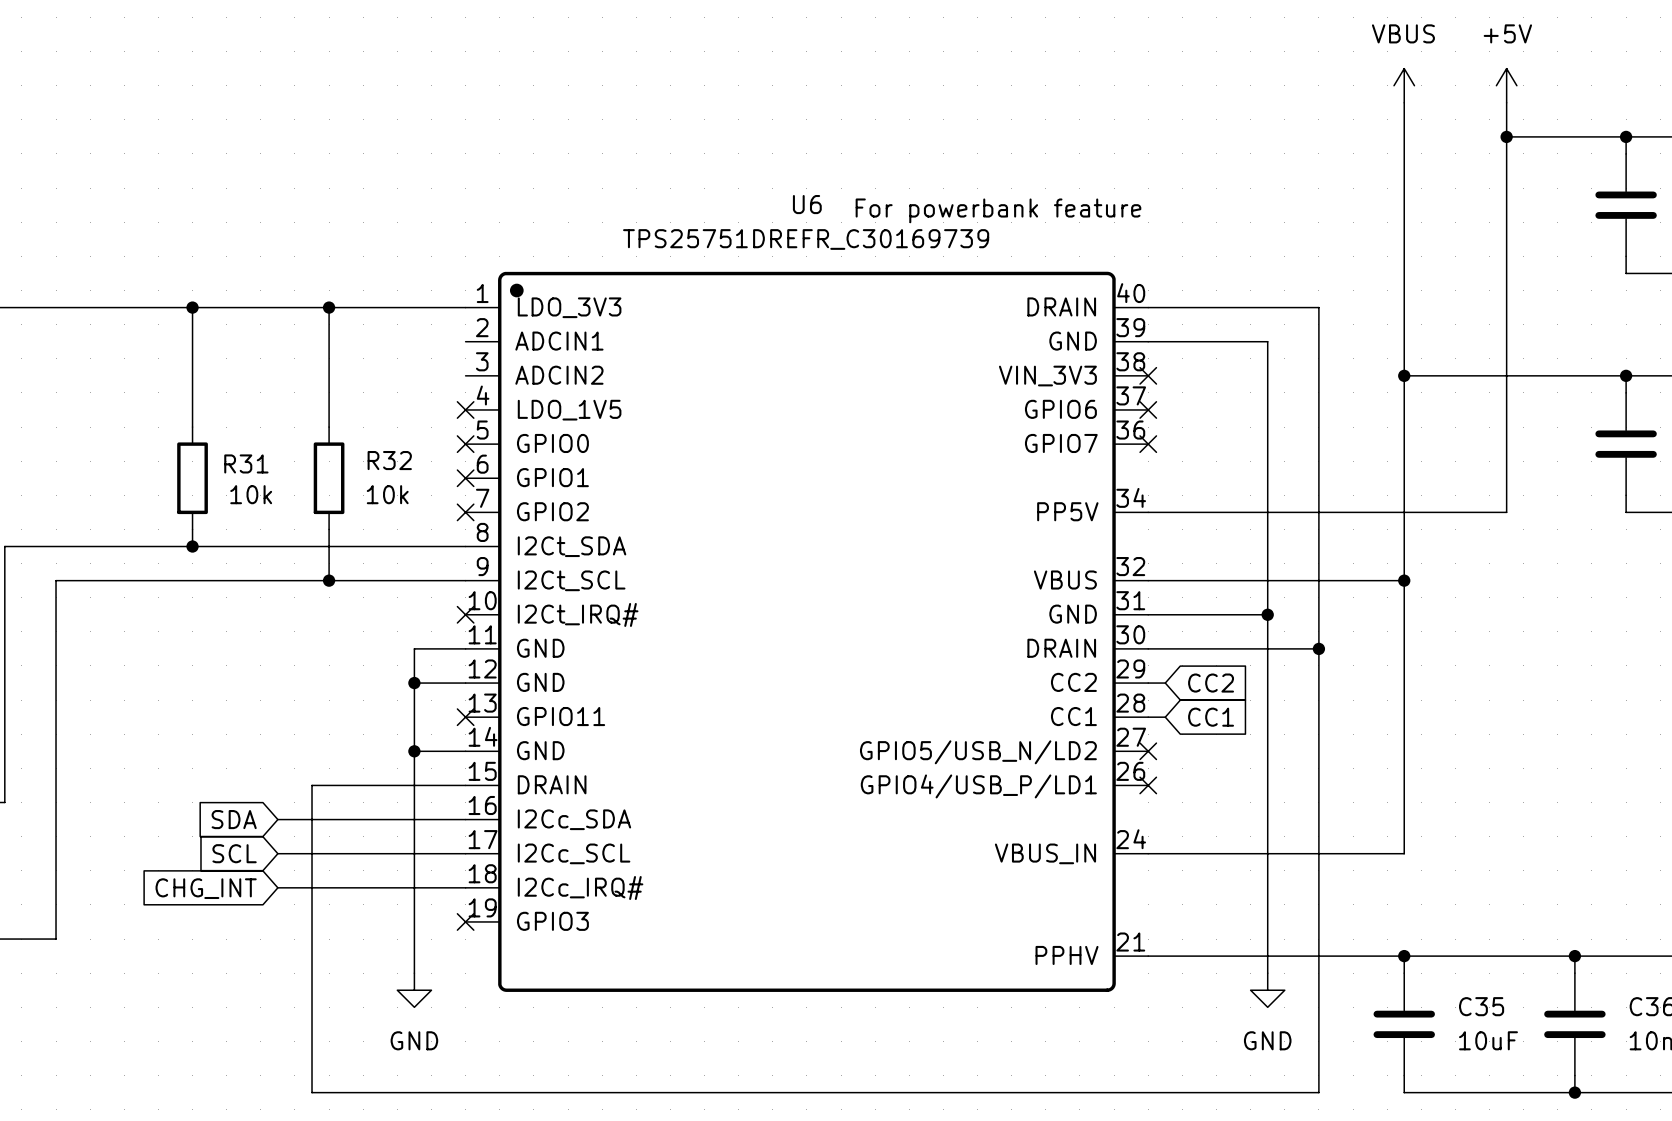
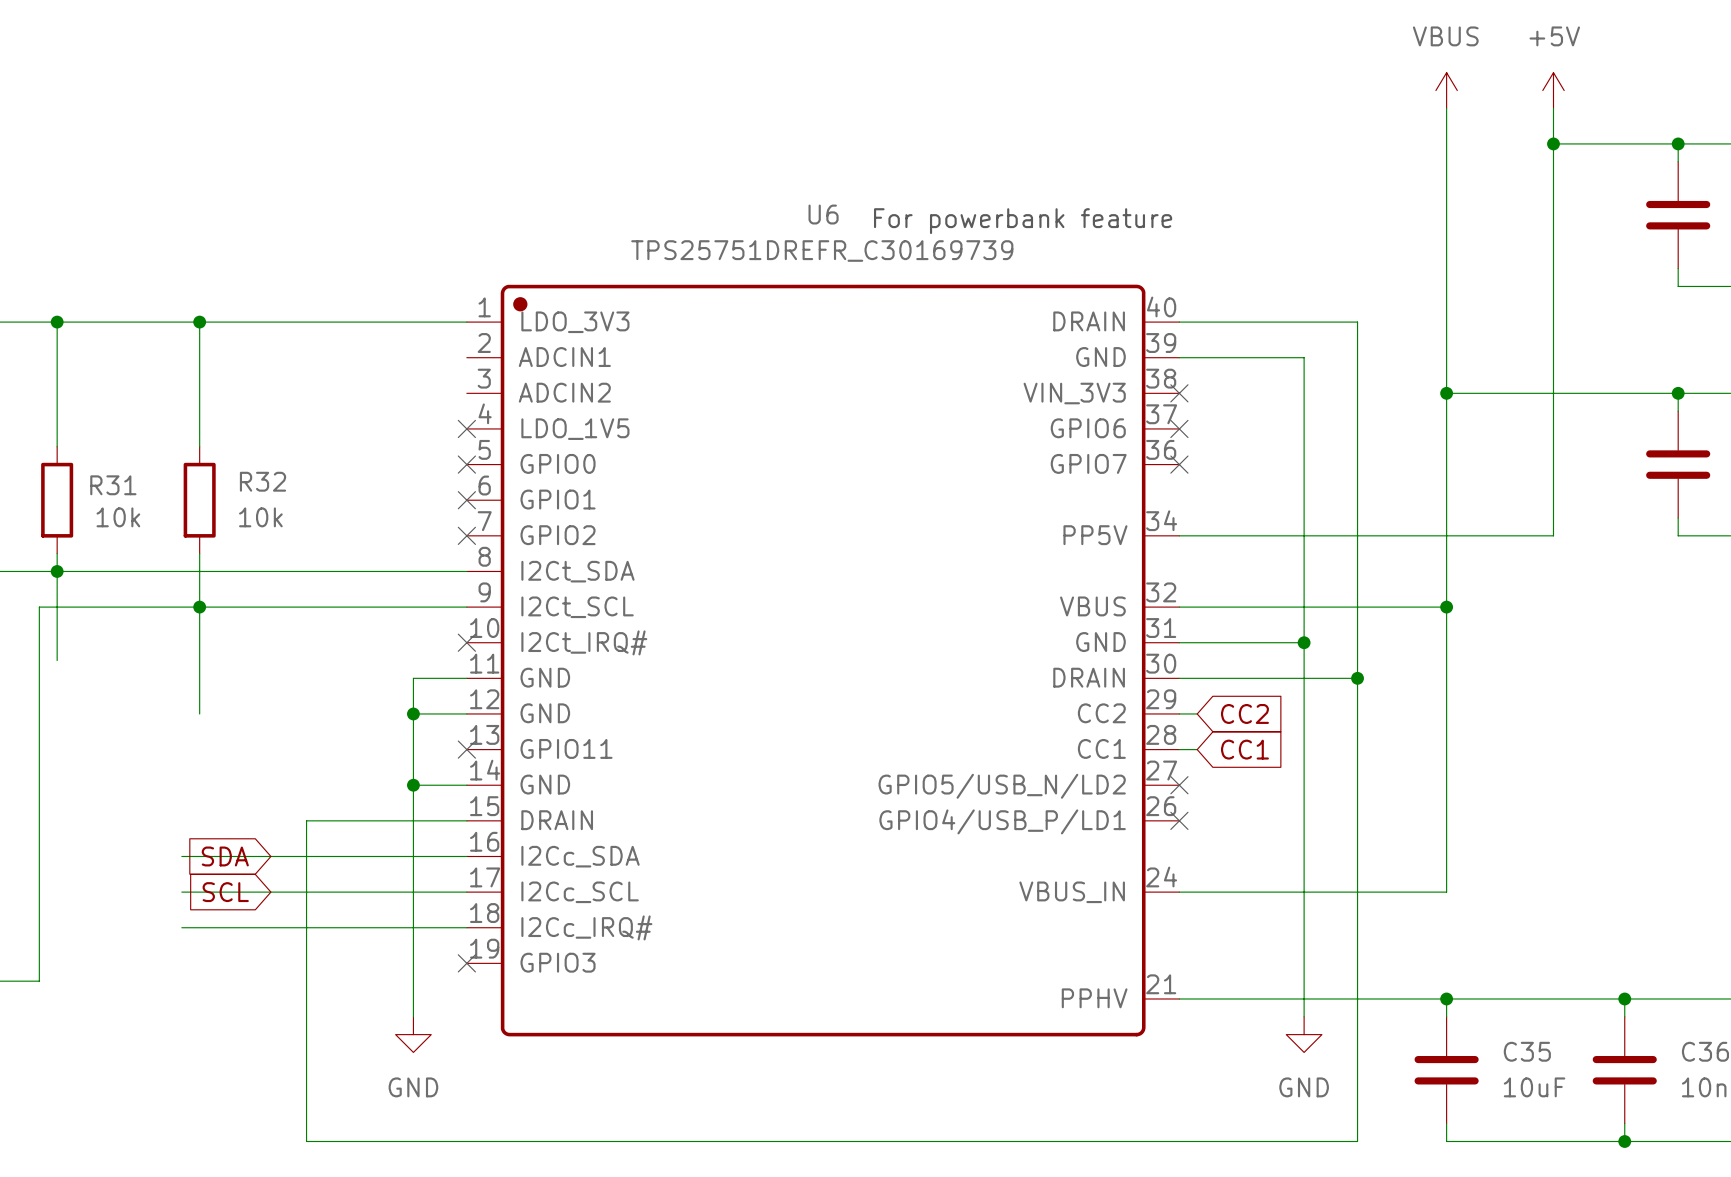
junction: none -> (57, 322)
wire: (192, 307) (192, 427) -> (57, 322) (57, 446)
junction position: (192, 307) -> (199, 322)
wire: (329, 307) (329, 427) -> (199, 322) (199, 446)
junction: (329, 307) -> none
R31 position: (192, 478) -> (57, 500)
R32 position: (329, 478) -> (199, 500)
wire: none -> (57, 553) (57, 660)
wire: (192, 529) (192, 546) -> none
wire: none -> (199, 553) (199, 713)
wire: (329, 529) (329, 580) -> none
junction: none -> (57, 571)
junction position: (192, 546) -> (199, 607)
junction: (329, 580) -> none
wire: none -> (181, 856) (270, 856)
wire: none -> (181, 892) (270, 892)
wire: none -> (181, 927) (270, 927)
global label: CHG_INT (206, 888) -> none

